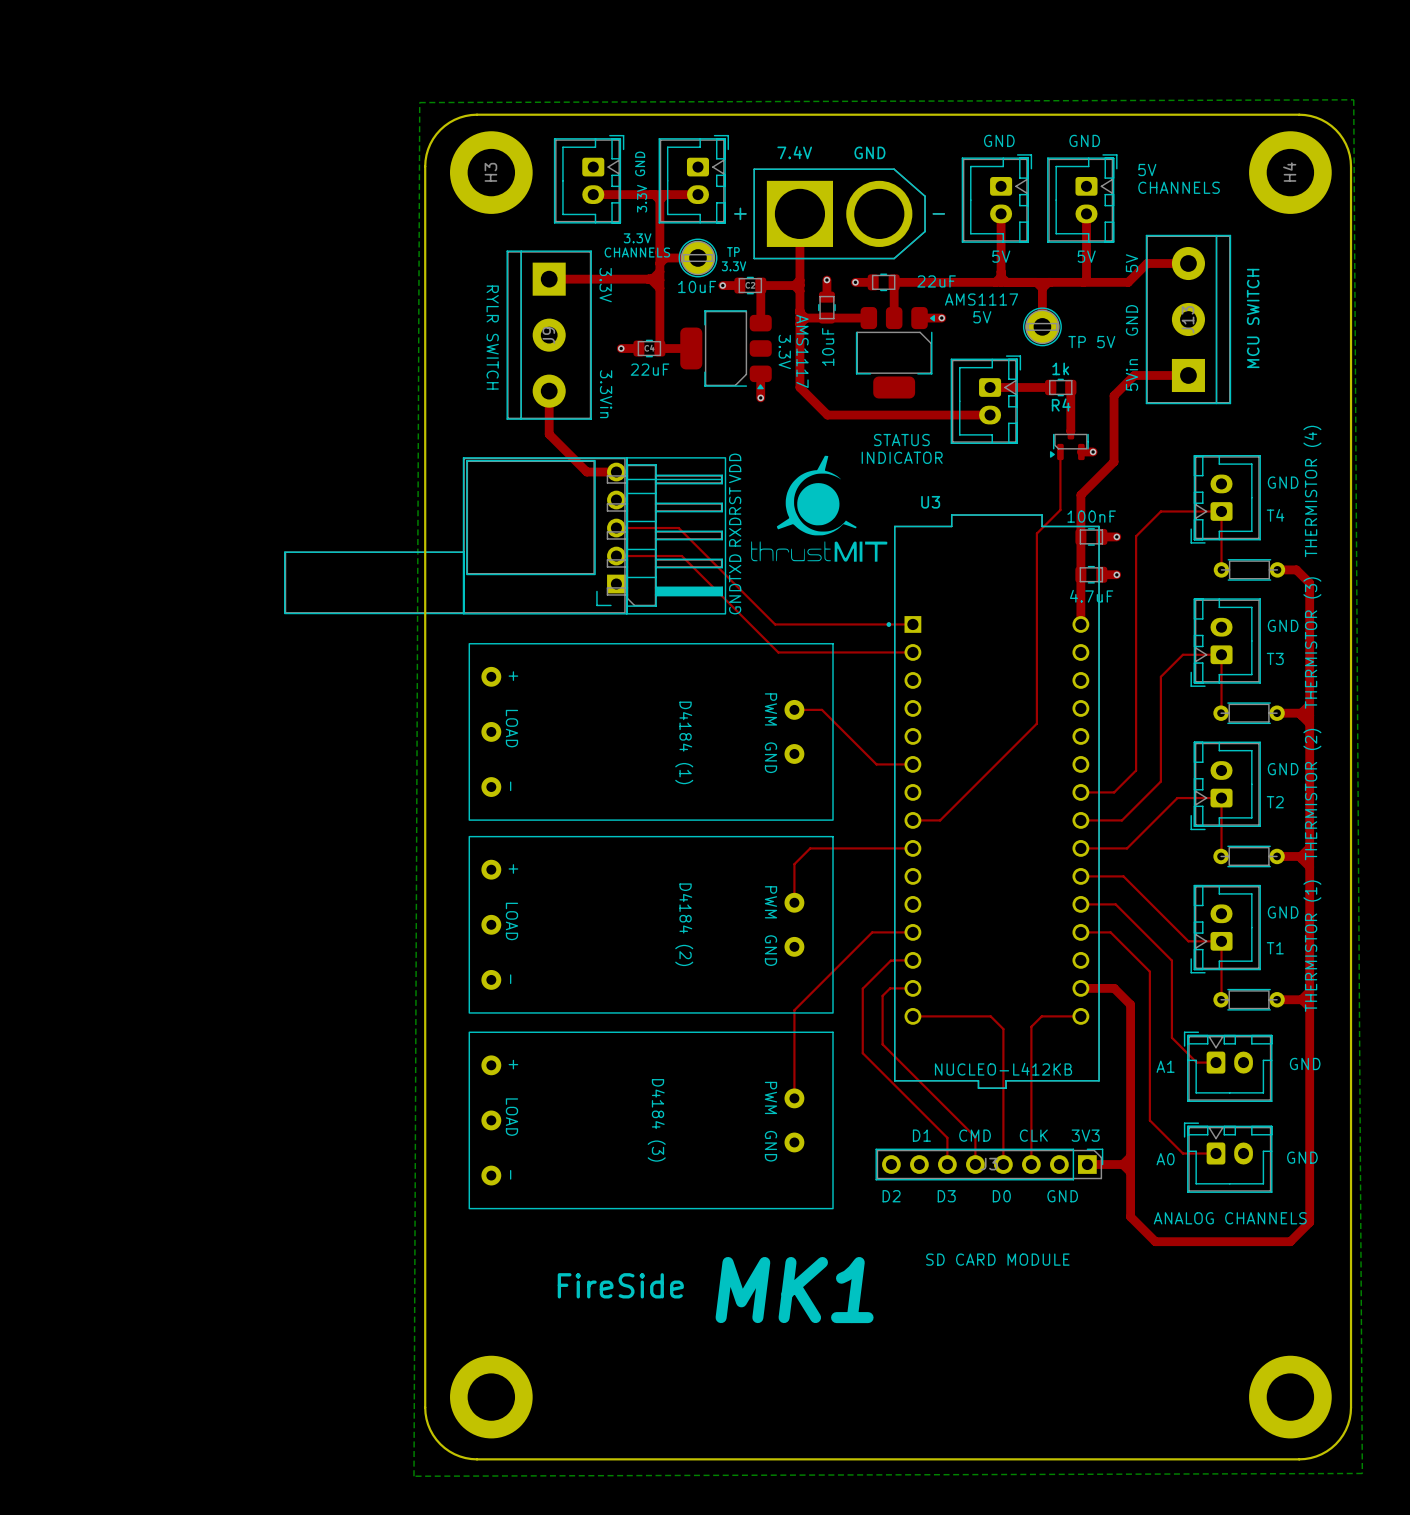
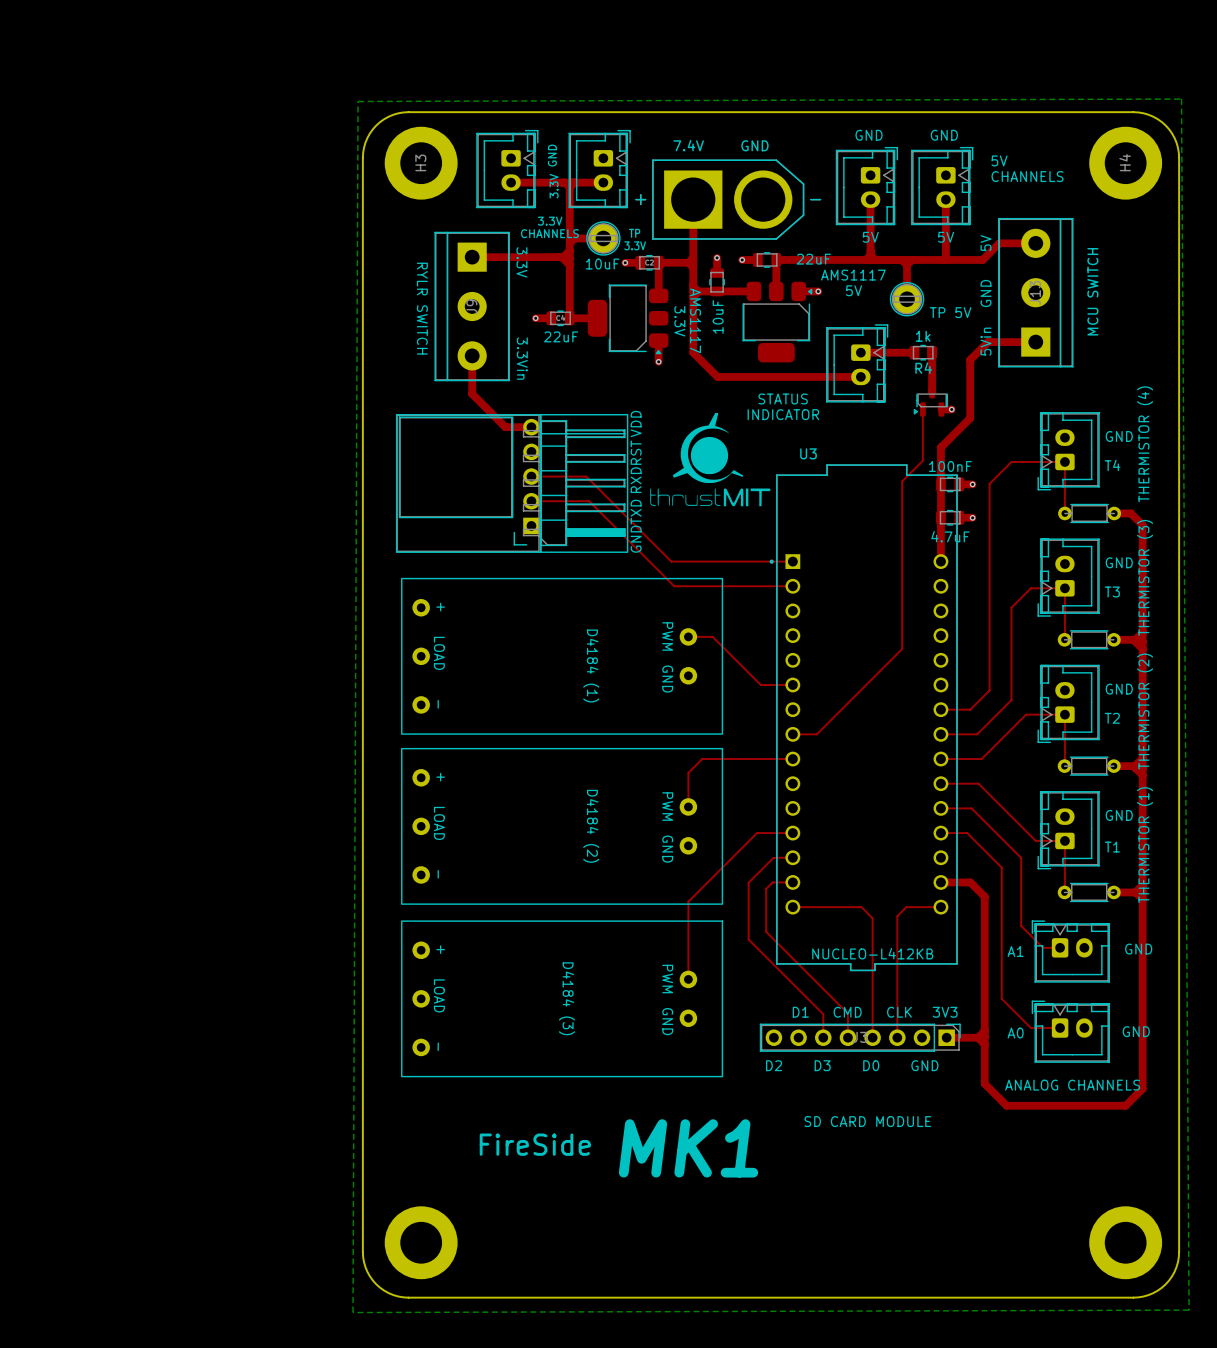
part: (505, 535) -> none
part: none -> (512, 483)

